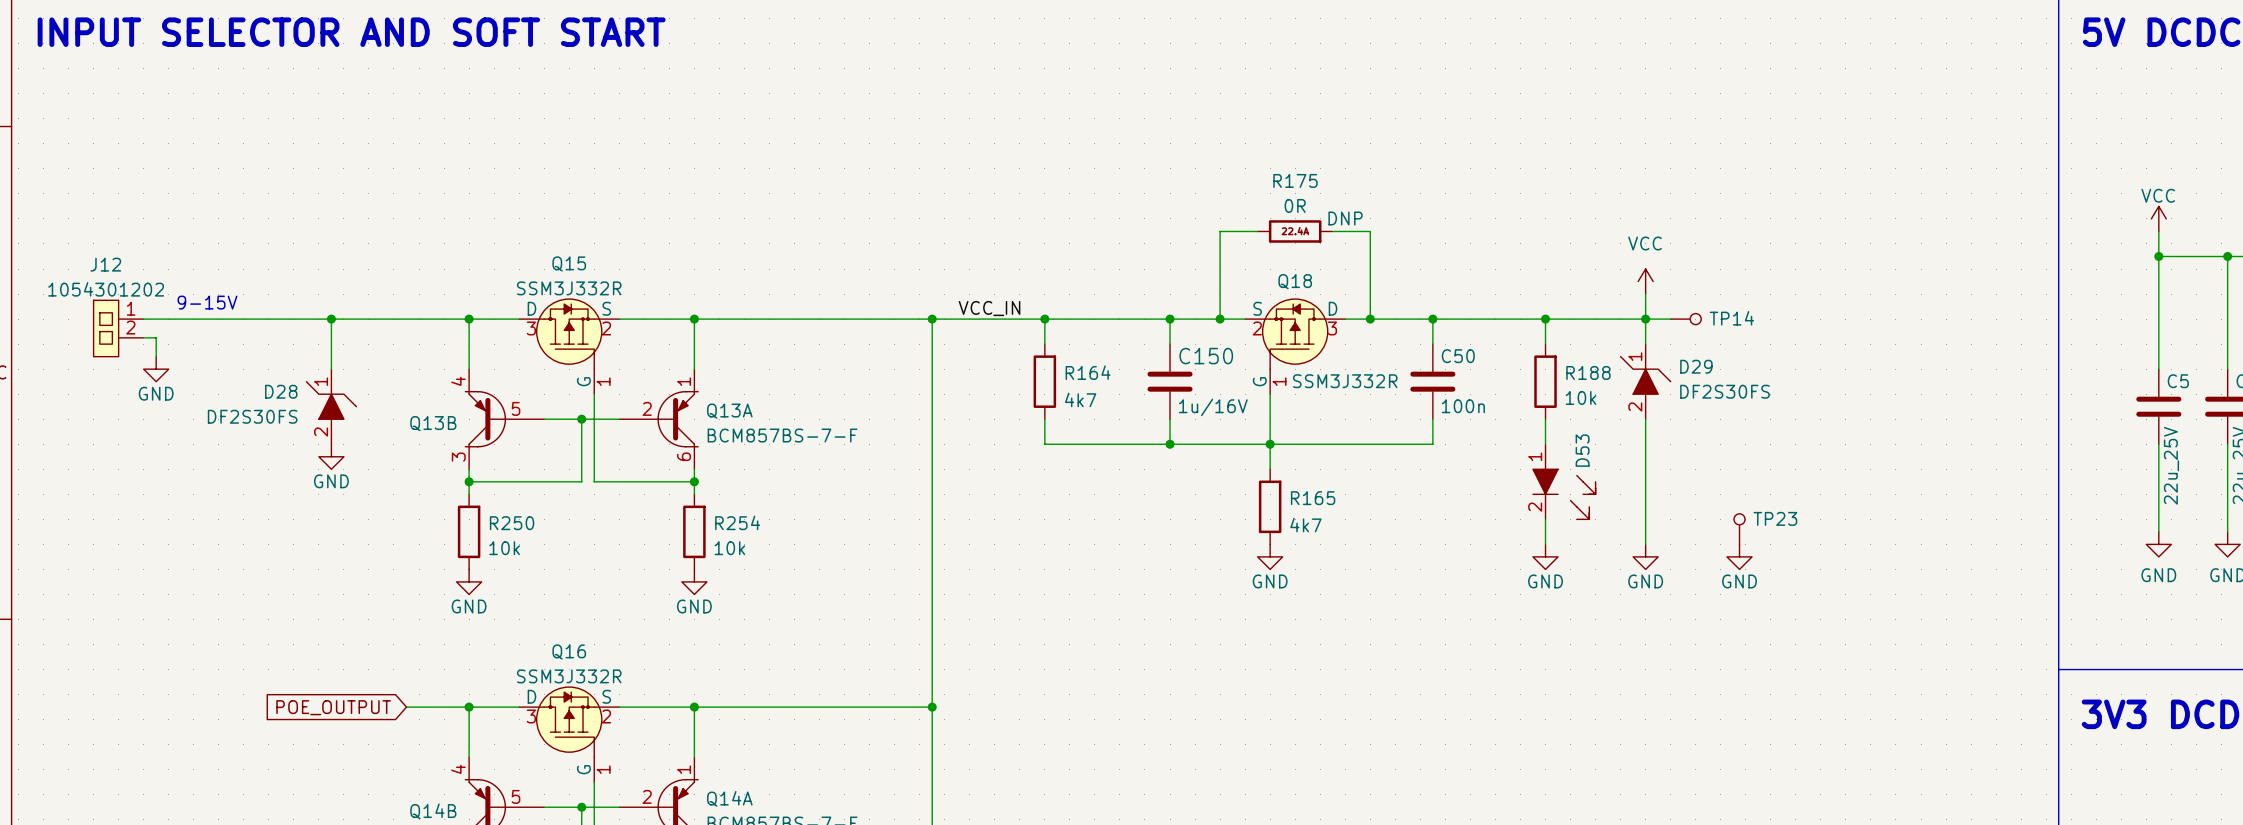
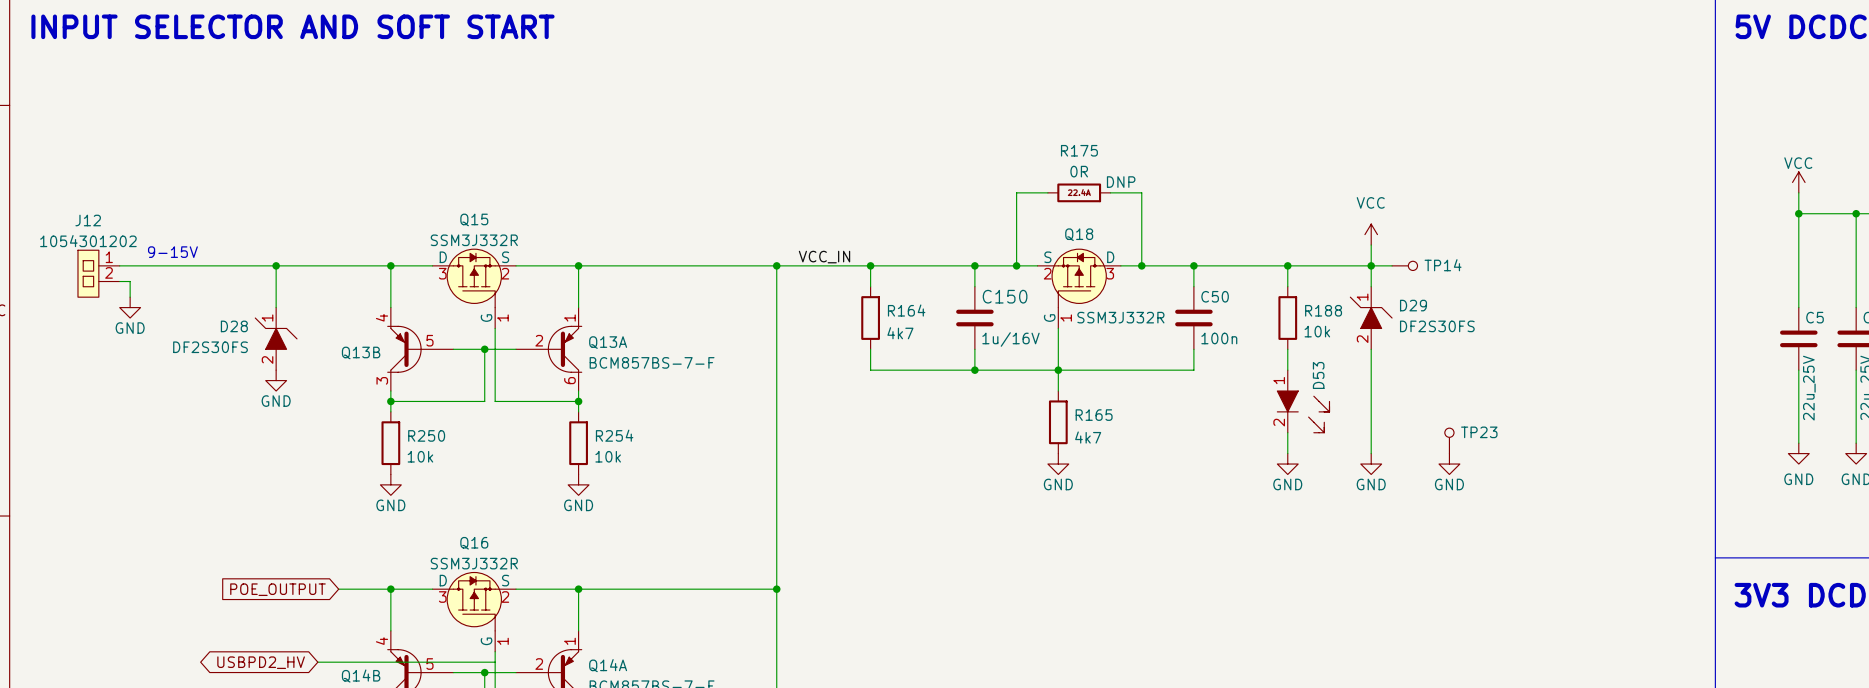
wire: none -> (317, 662) (495, 662)
global label: none -> USBPD2_HV (261, 662)

